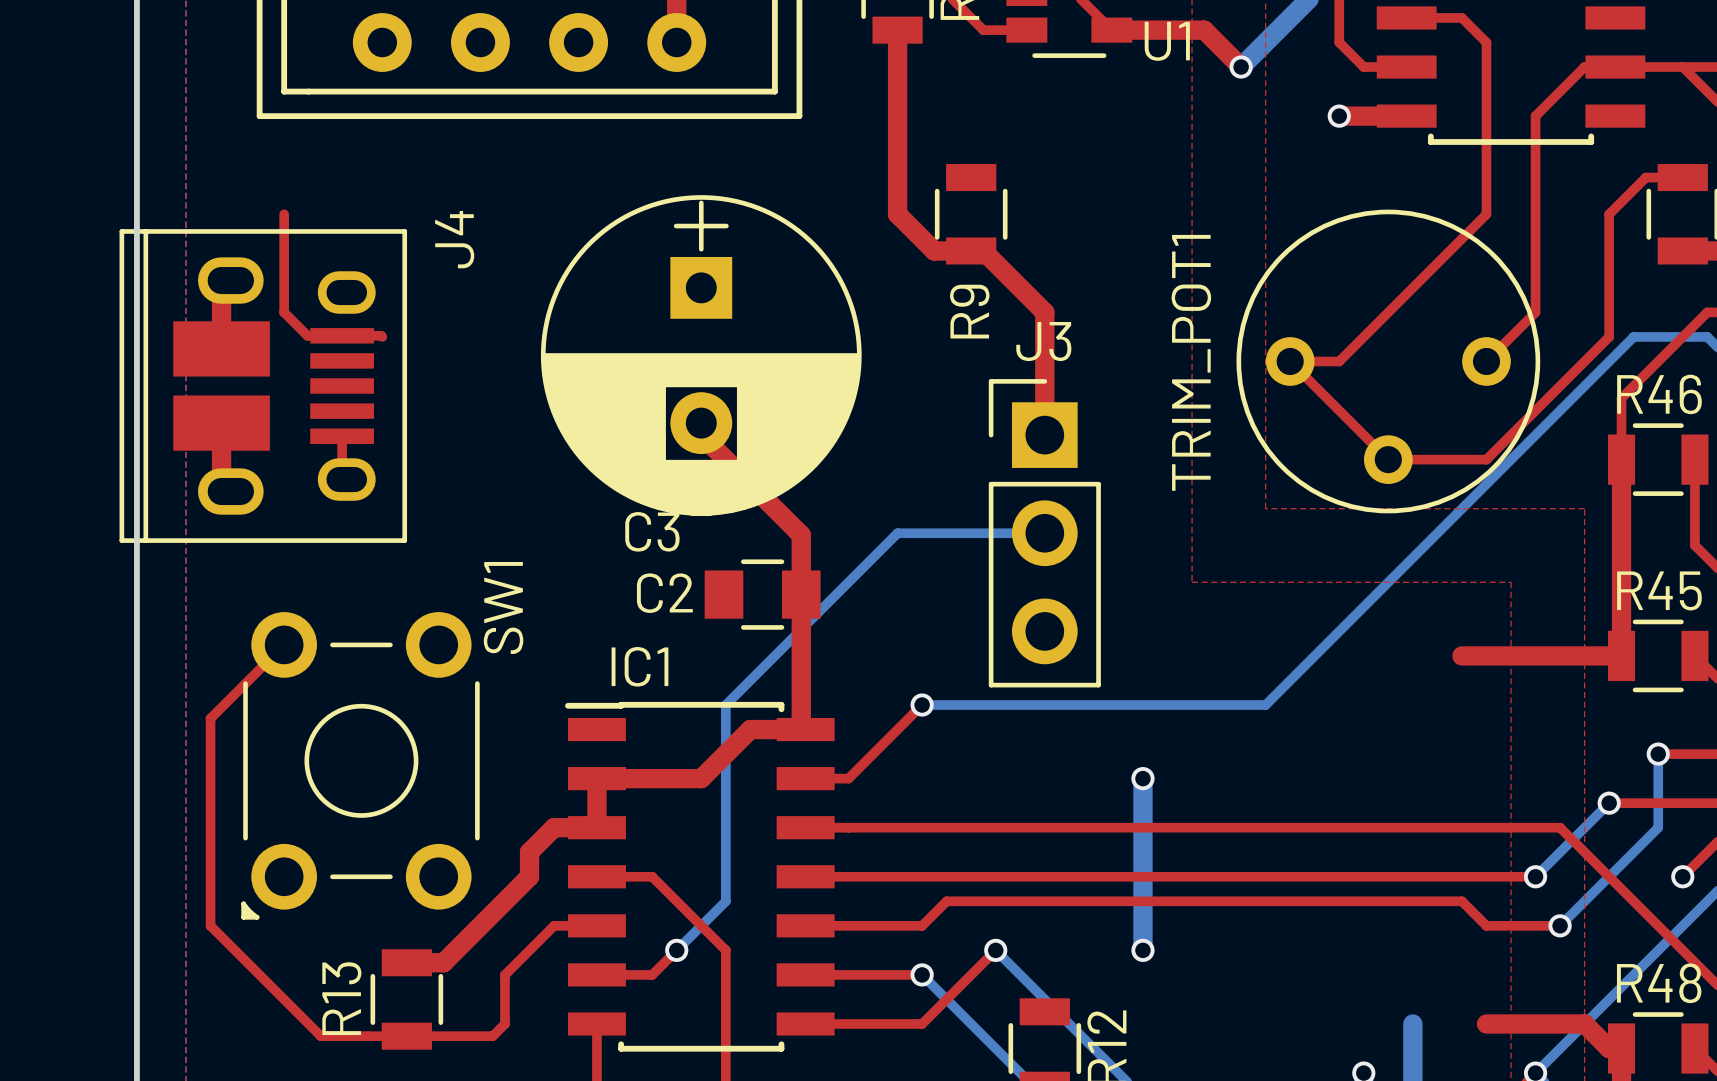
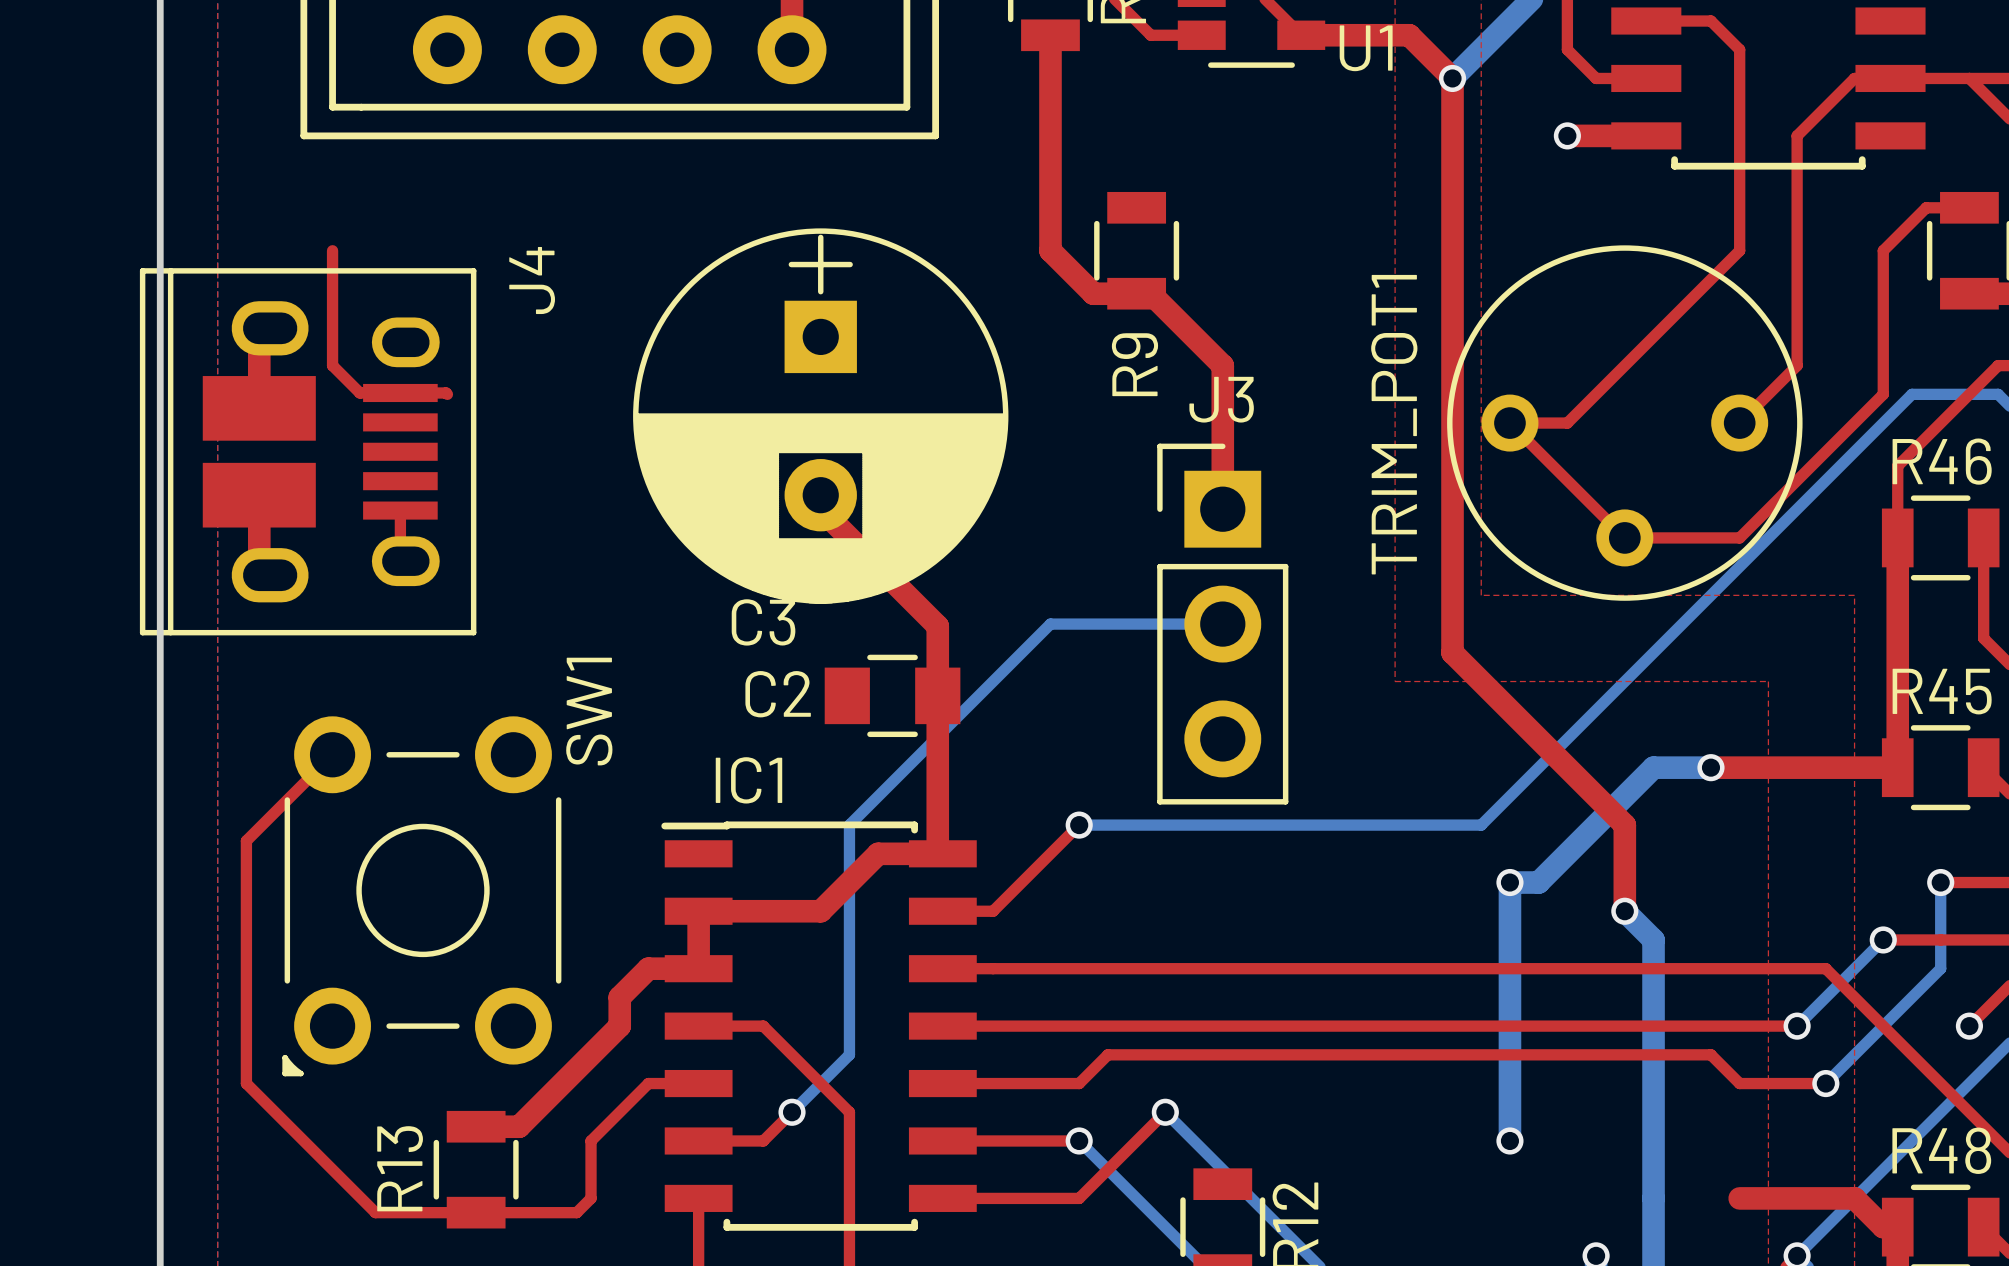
top track: none -> (1452, 78) (1452, 652) (1624, 825) (1624, 911)
bottom track: none -> (1710, 767) (1653, 767) (1538, 882) (1509, 882) (1509, 1140)
via: none -> (1710, 767)
via: none -> (1509, 882)
bottom track: (1142, 778) (1142, 950) -> none
via: (1142, 778) -> none
bottom track: none -> (1624, 911) (1653, 939) (1653, 1198)
via: none -> (1624, 911)
via: (1142, 950) -> none
via: none -> (1509, 1140)

